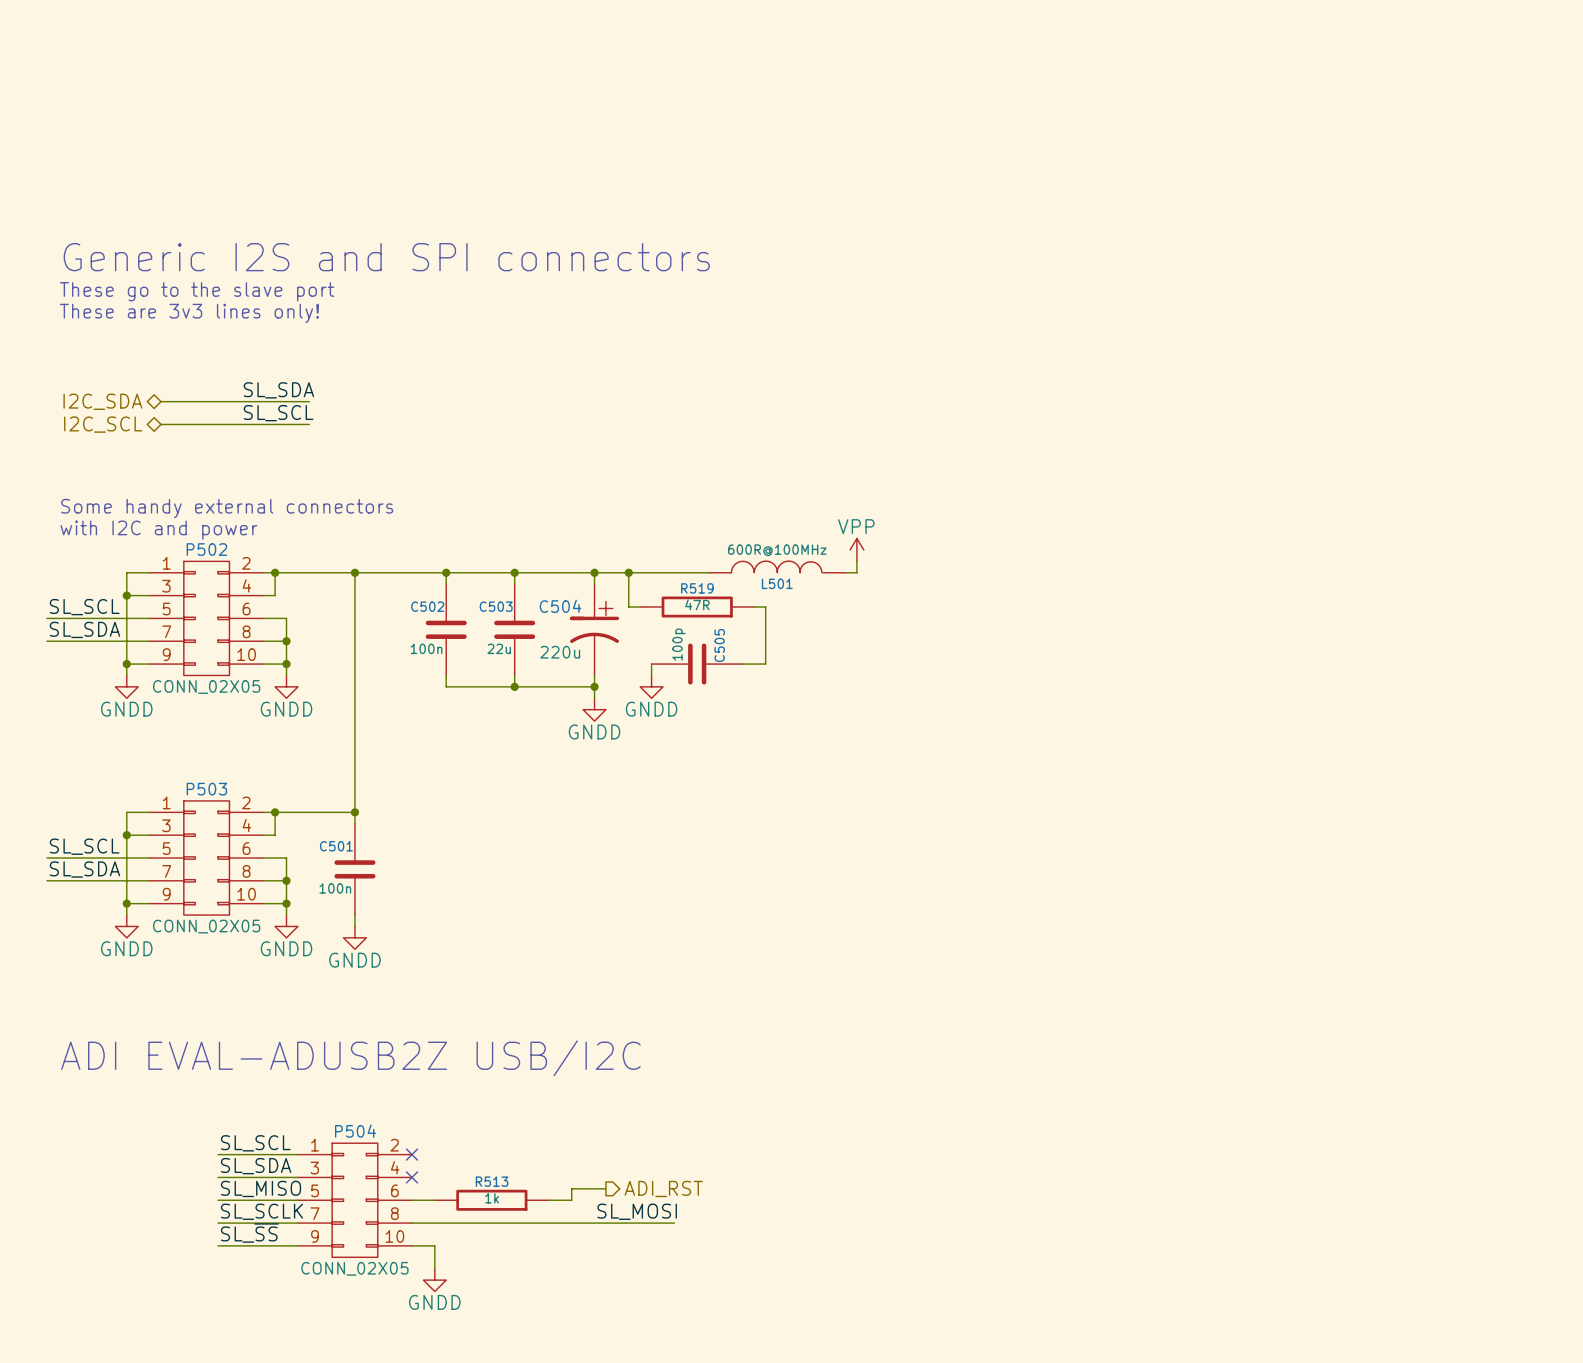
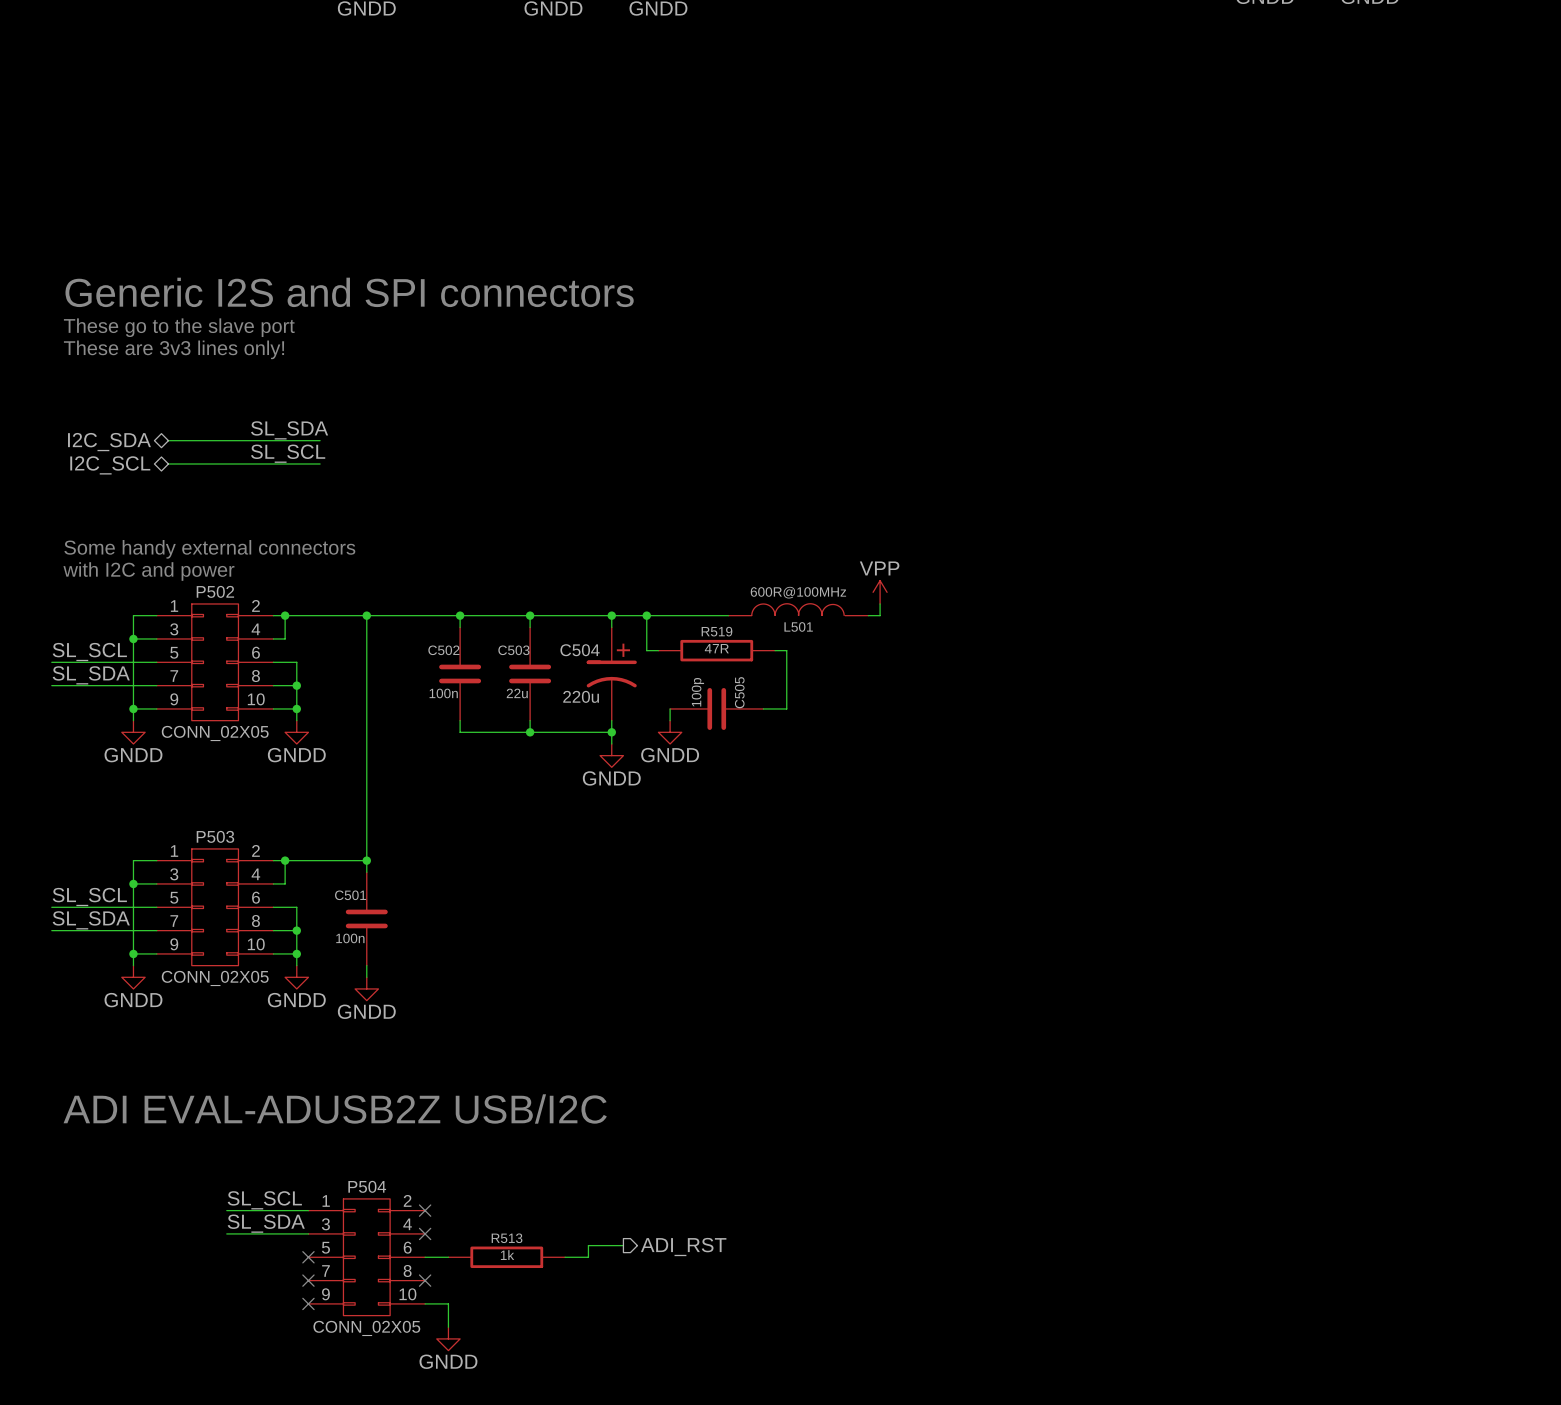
label: SL_MISO (261, 1188) -> none
wire: (218, 1200) (297, 1200) -> none
no-connect mark: none -> (308, 1257)
label: SL_SCLK (261, 1211) -> none
label: SL_MOSI (637, 1211) -> none
wire: (218, 1223) (297, 1223) -> none
no-connect mark: none -> (308, 1280)
wire: (412, 1223) (674, 1223) -> none
no-connect mark: none -> (425, 1280)
label: SL_~{SS} (249, 1233) -> none
wire: (218, 1245) (297, 1245) -> none
no-connect mark: none -> (308, 1303)

